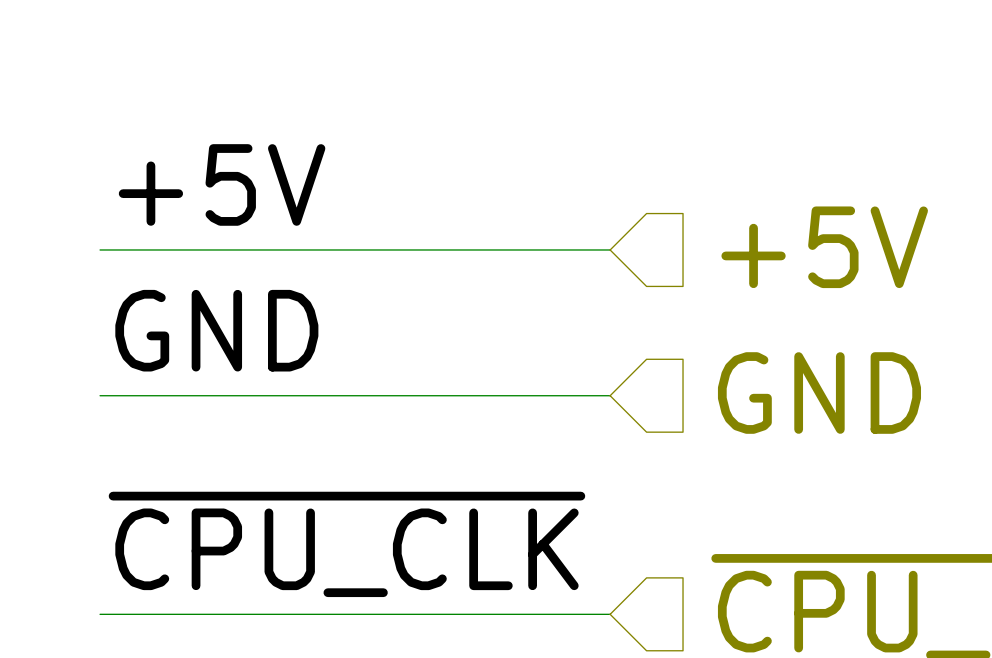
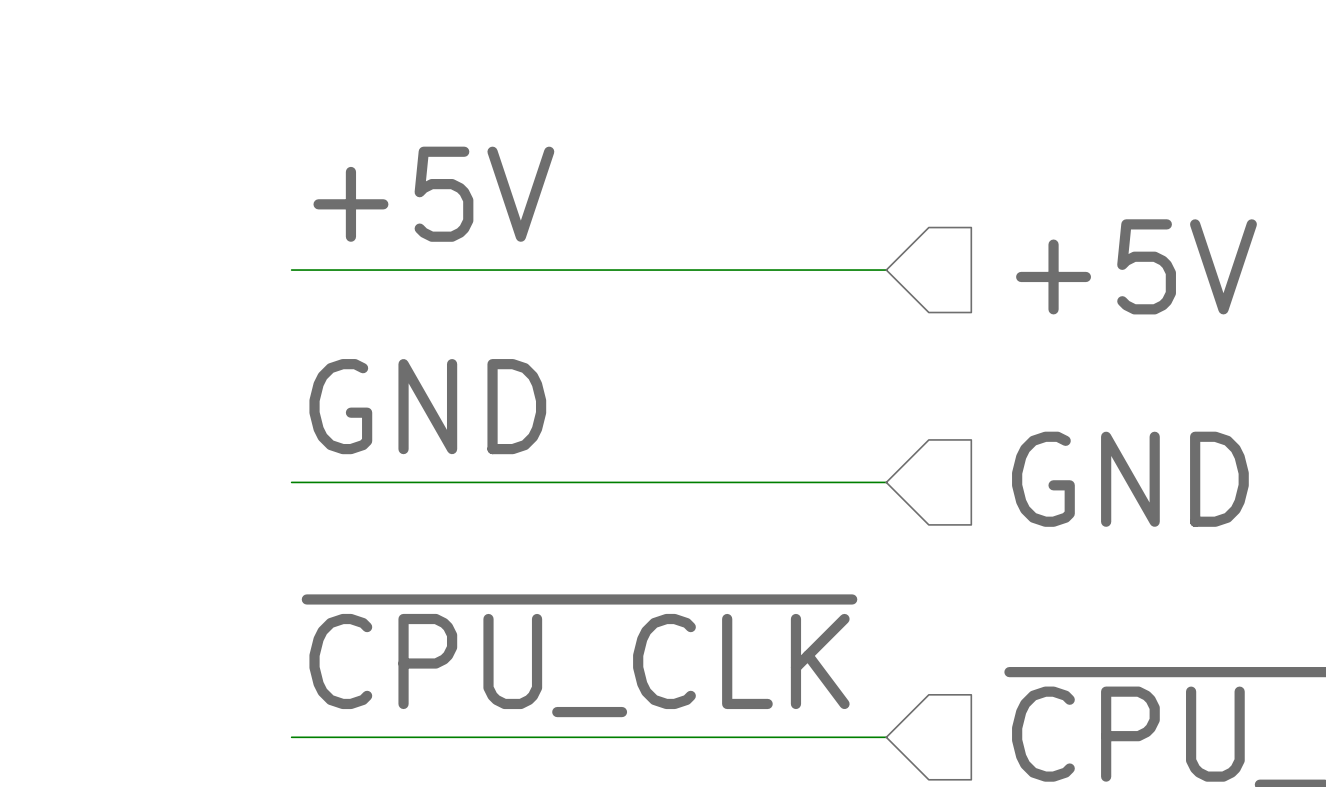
label position: +5V (222, 184) -> +5V (433, 194)
hierarchical label position: +5V (824, 247) -> +5V (1136, 266)
wire: (100, 249) (610, 249) -> (291, 270) (886, 270)

